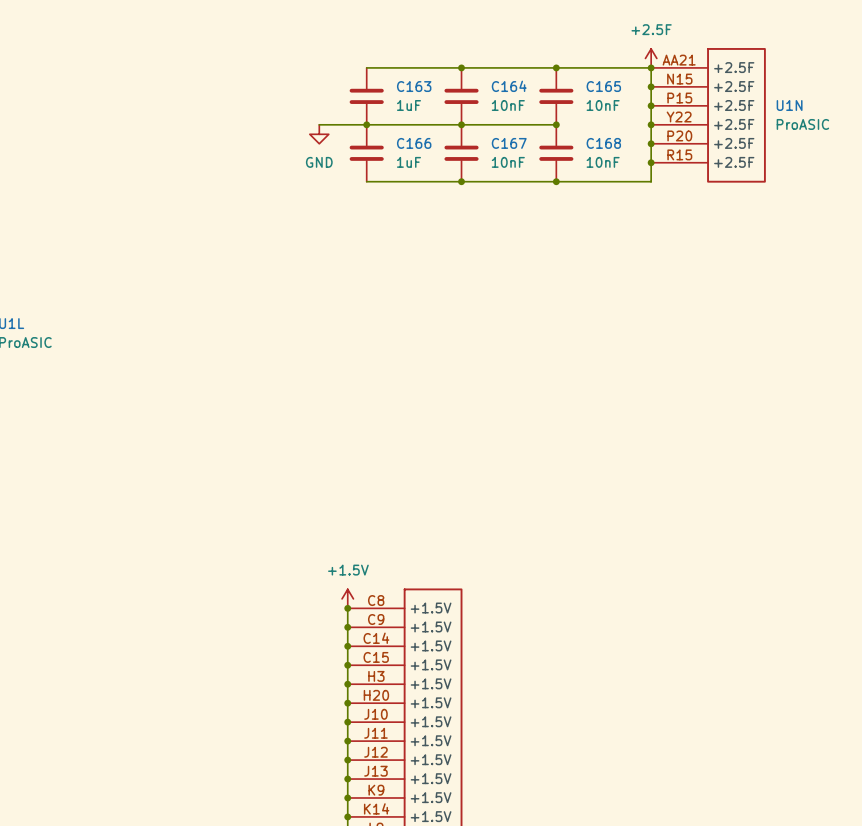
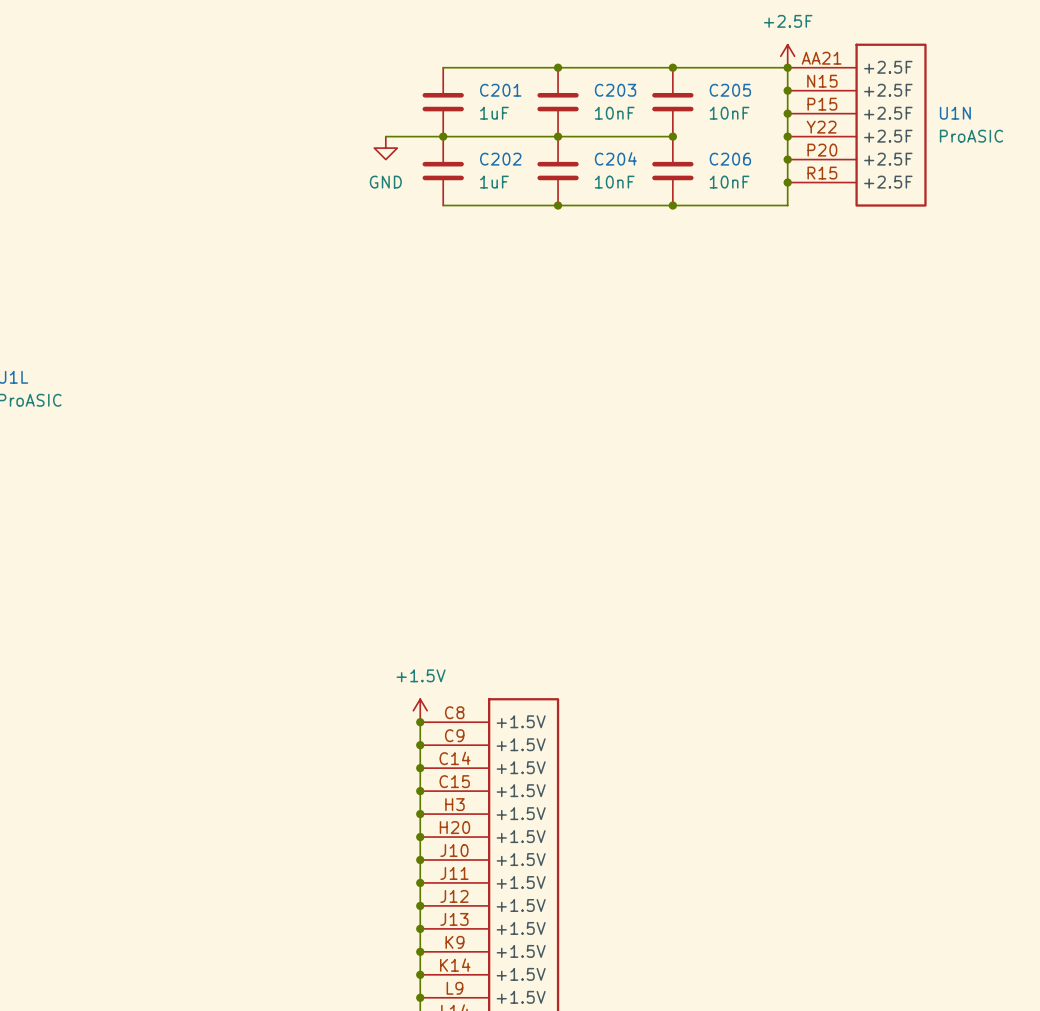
C163 name: C163 (414, 86) -> C201 (500, 90)
C164 name: C164 (509, 86) -> C203 (615, 90)
C165 name: C165 (603, 86) -> C205 (730, 90)
C166 name: C166 (414, 143) -> C202 (500, 159)
C167 name: C167 (509, 143) -> C204 (615, 158)
C168 name: C168 (603, 143) -> C206 (730, 159)

